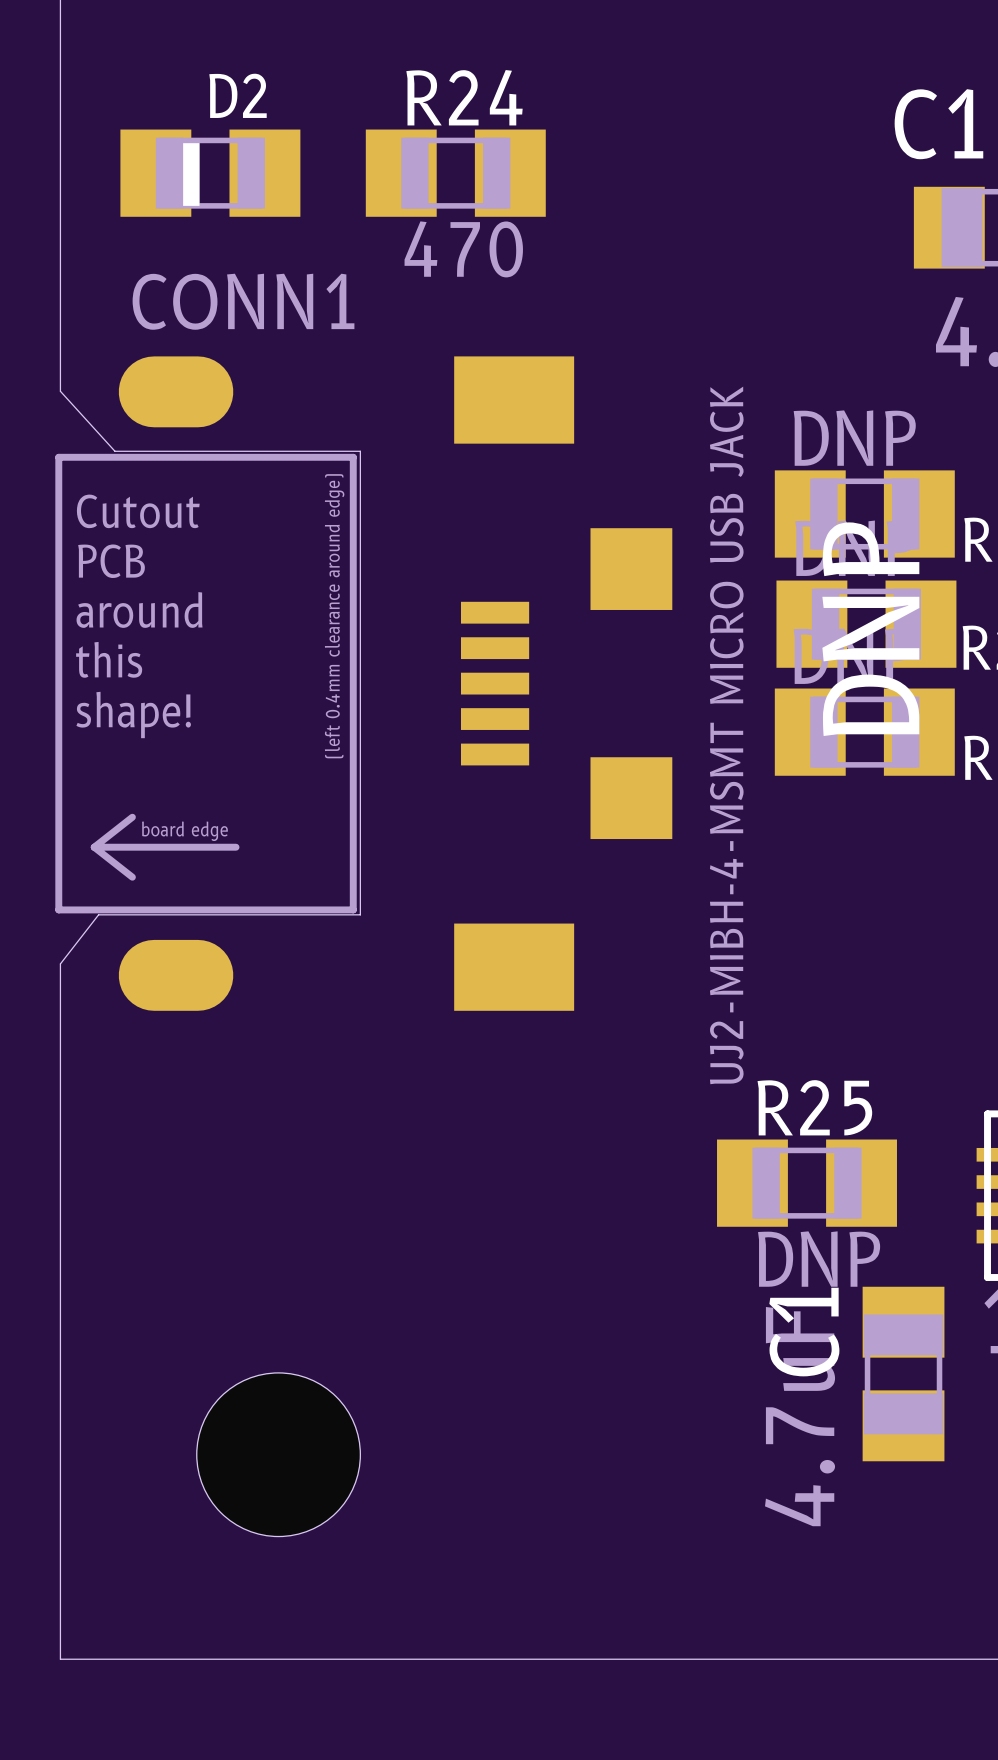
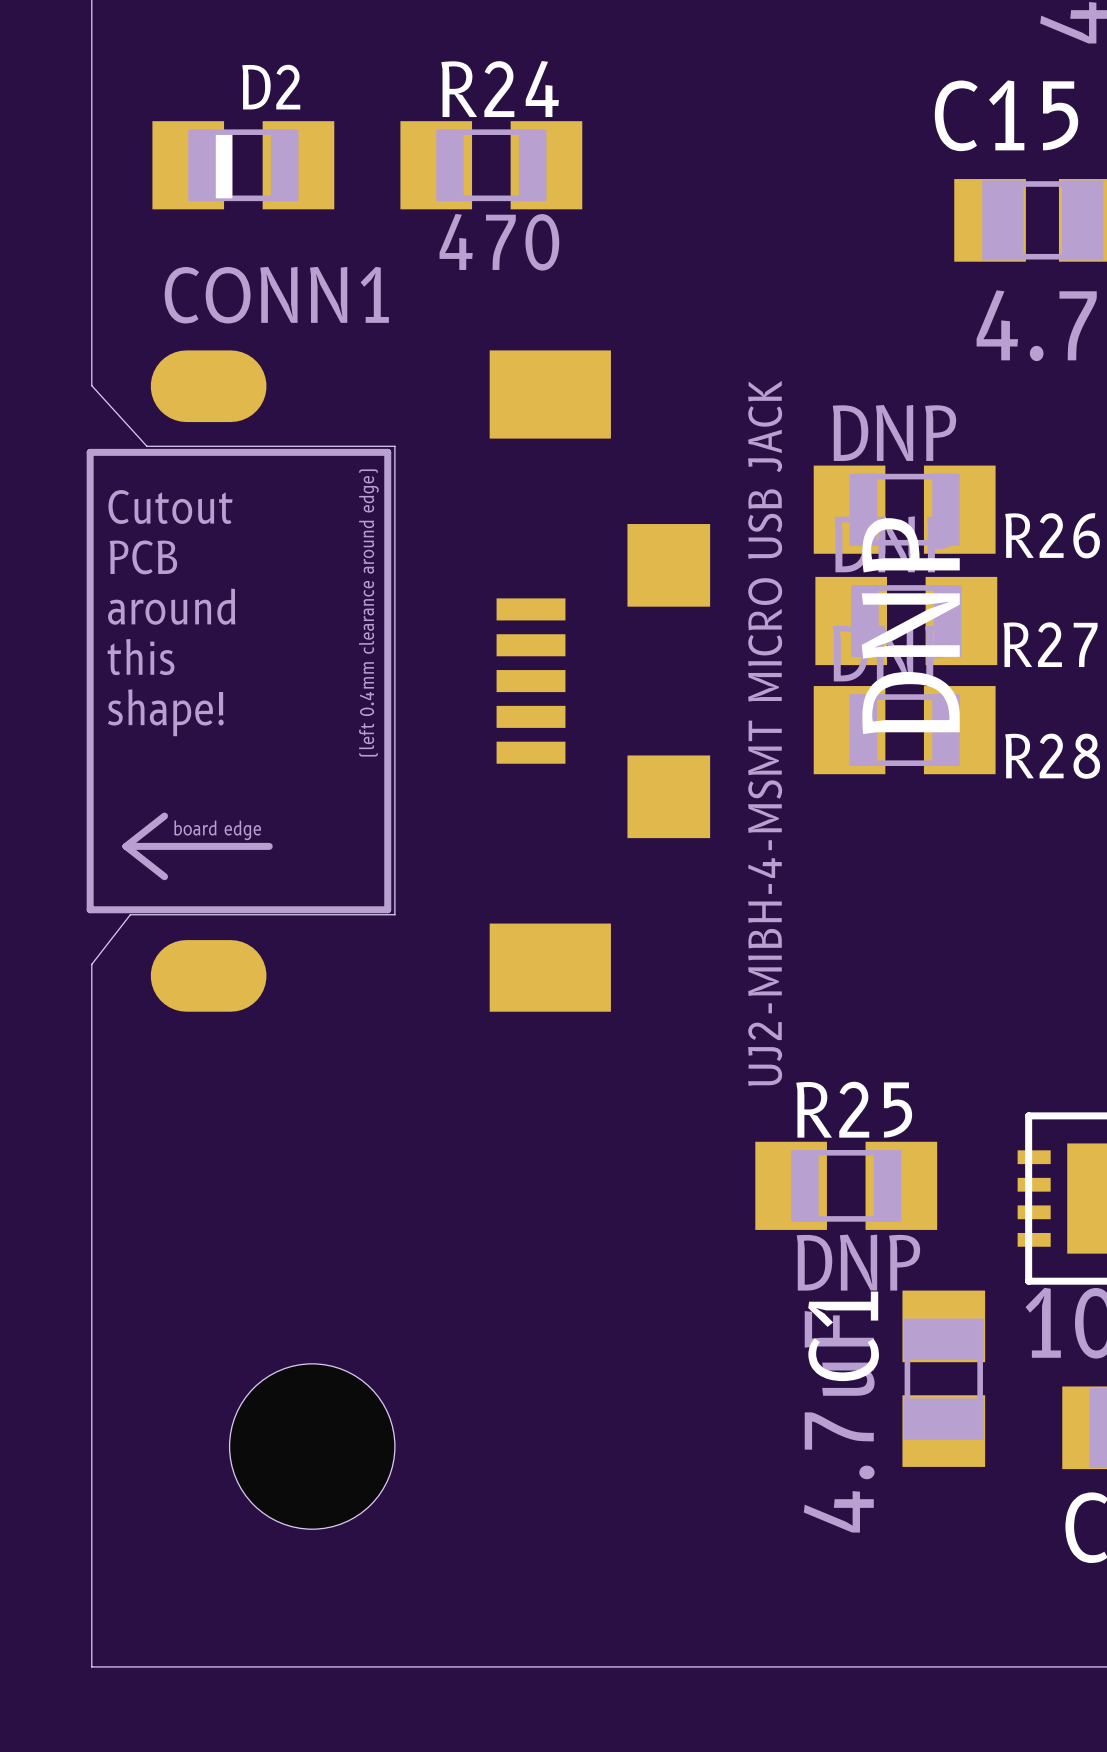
hole position: (278, 1454) -> (312, 1446)

